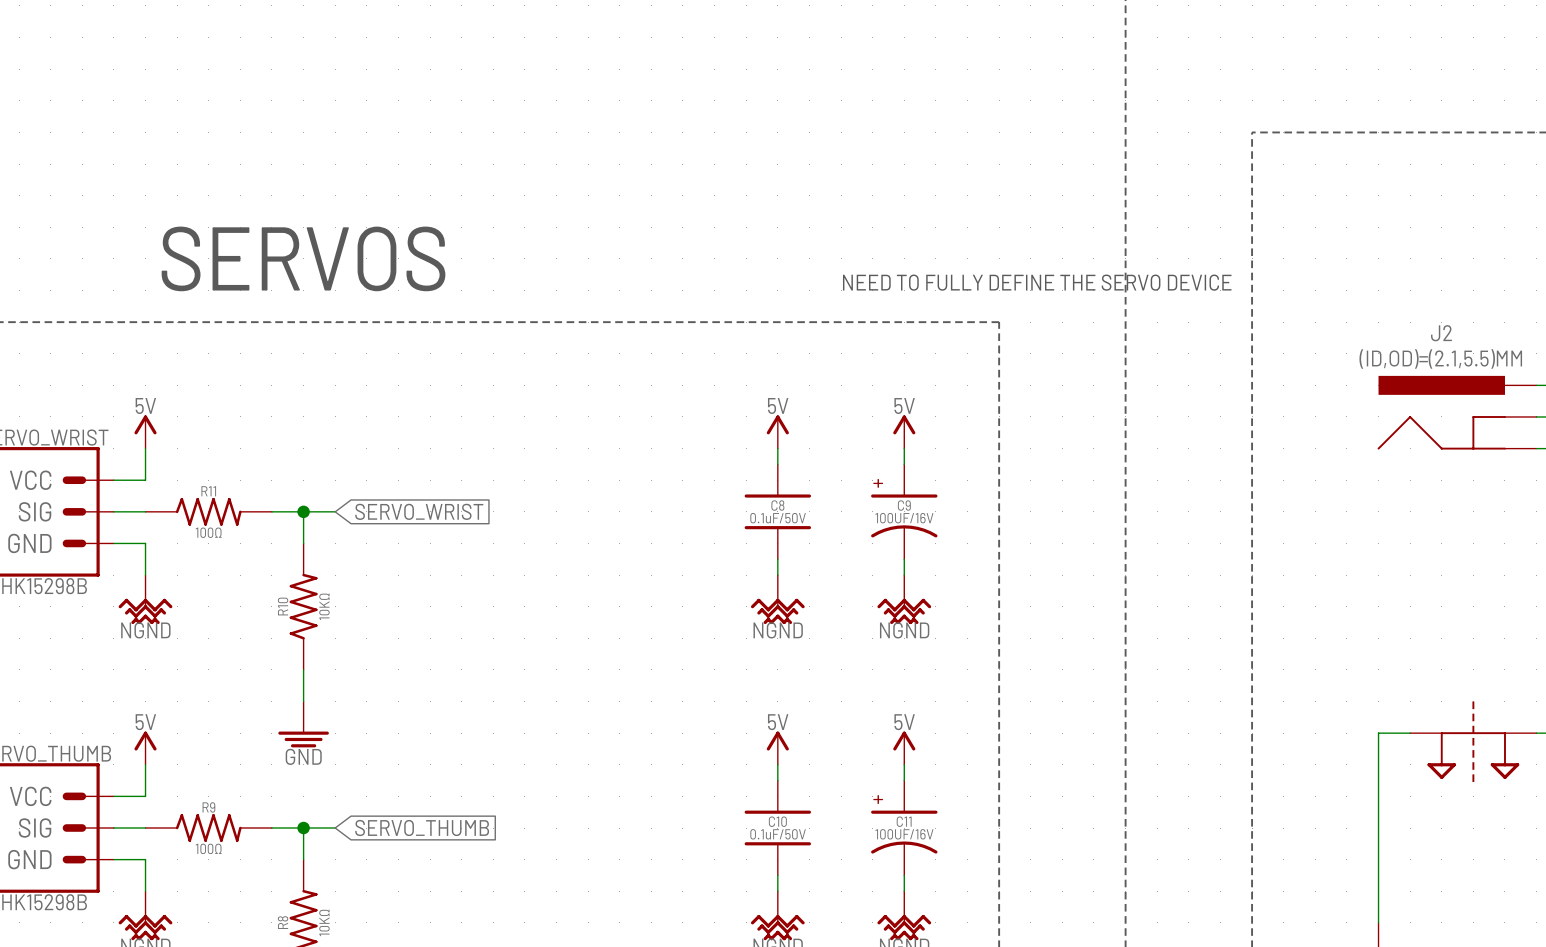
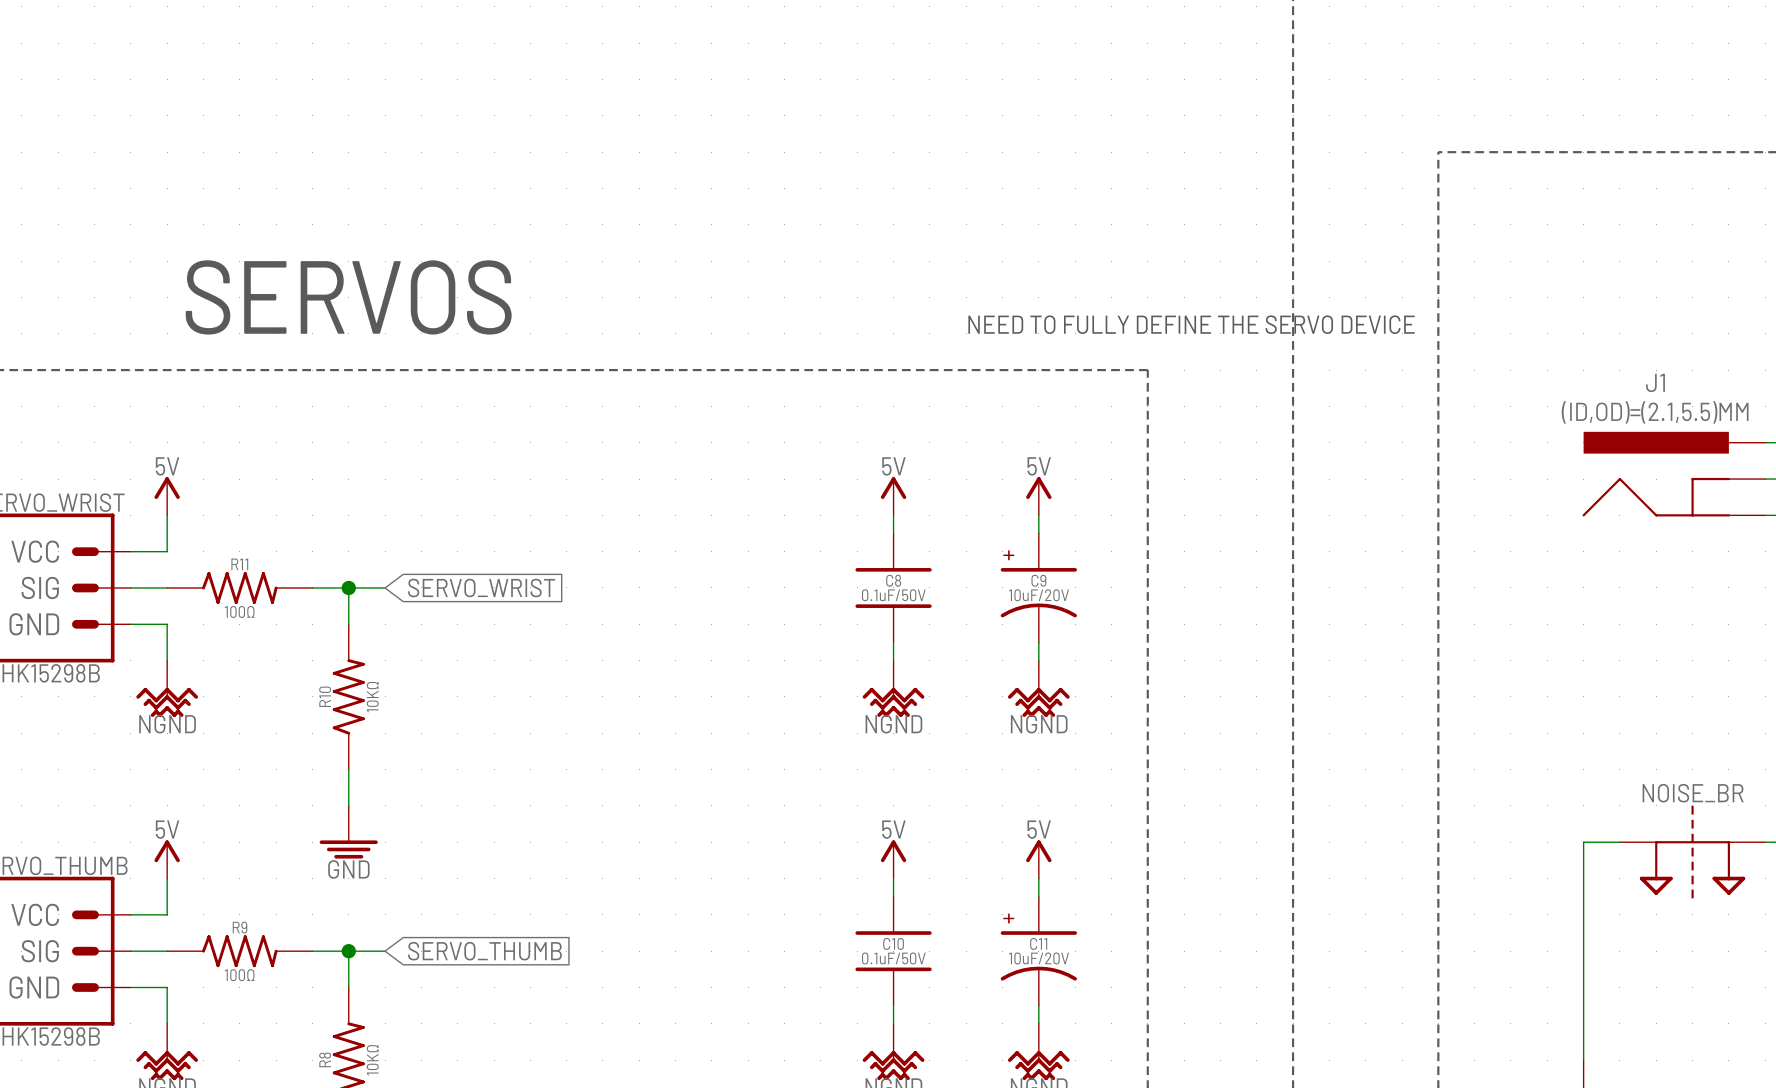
J2 name: J2 (1441, 333) -> J1 (1655, 382)
C9 value: 100UF/16V (904, 518) -> 10uF/20V (1039, 595)
NOISE_BR name: none -> NOISE_BR (1693, 793)
C11 value: 100UF/16V (904, 834) -> 10uF/20V (1039, 958)

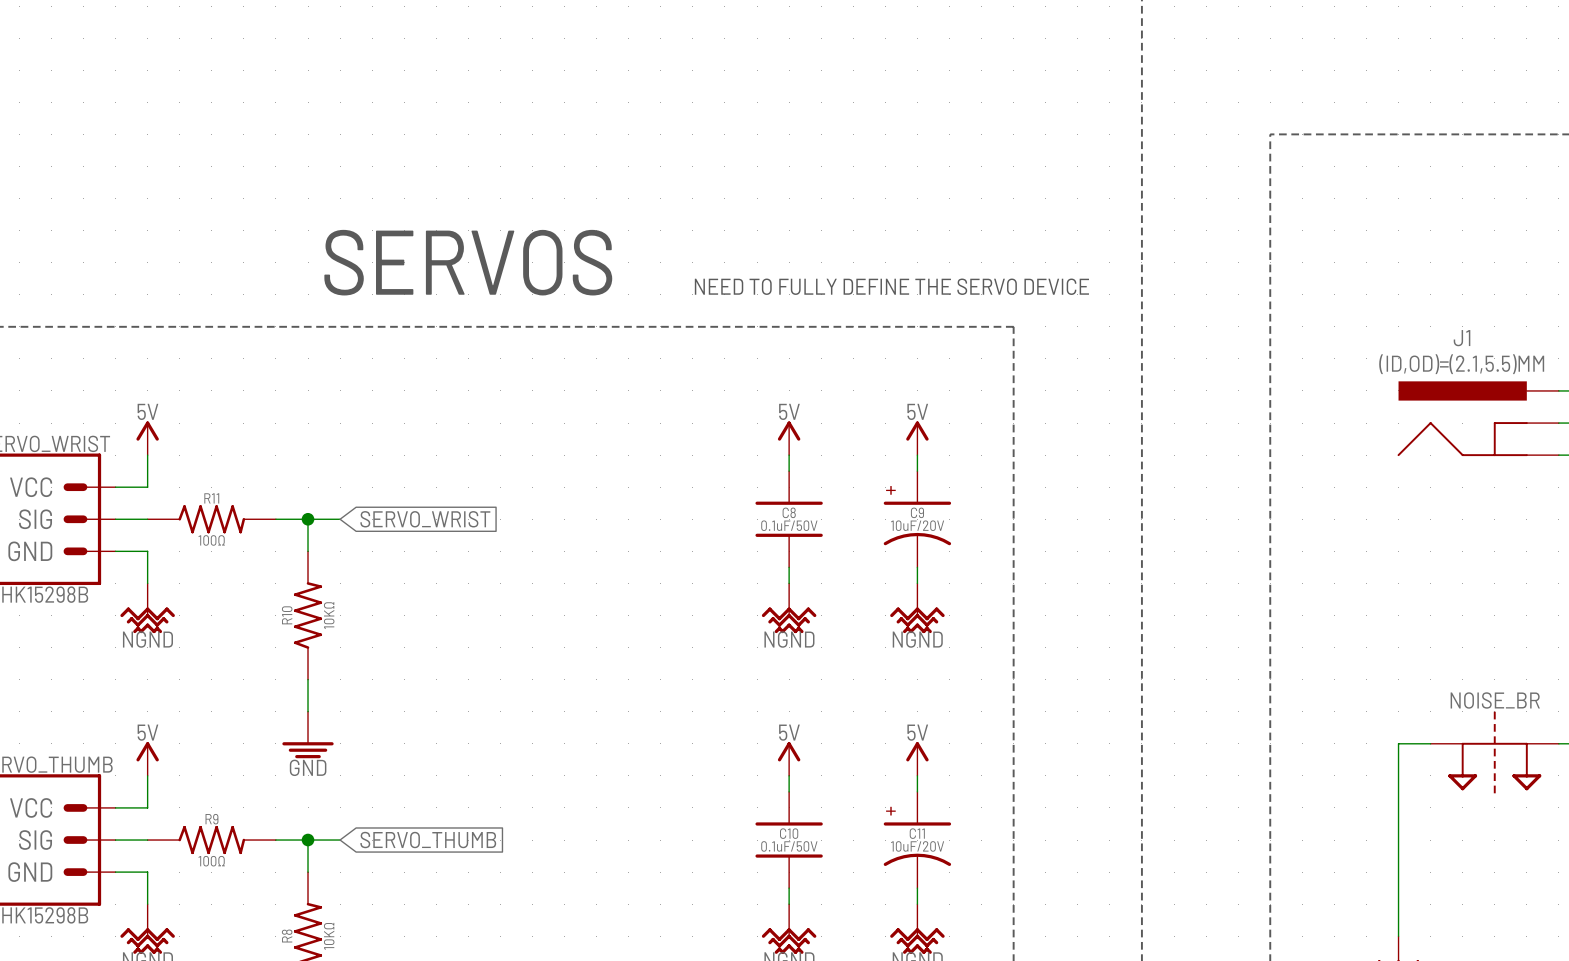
text position: SERVOS (348, 297) -> SERVOS (468, 262)
text position: NEED TO FULLY DEFINE THE SERVO DEVICE (1191, 324) -> NEED TO FULLY DEFINE THE SERVO DEVICE (891, 286)

